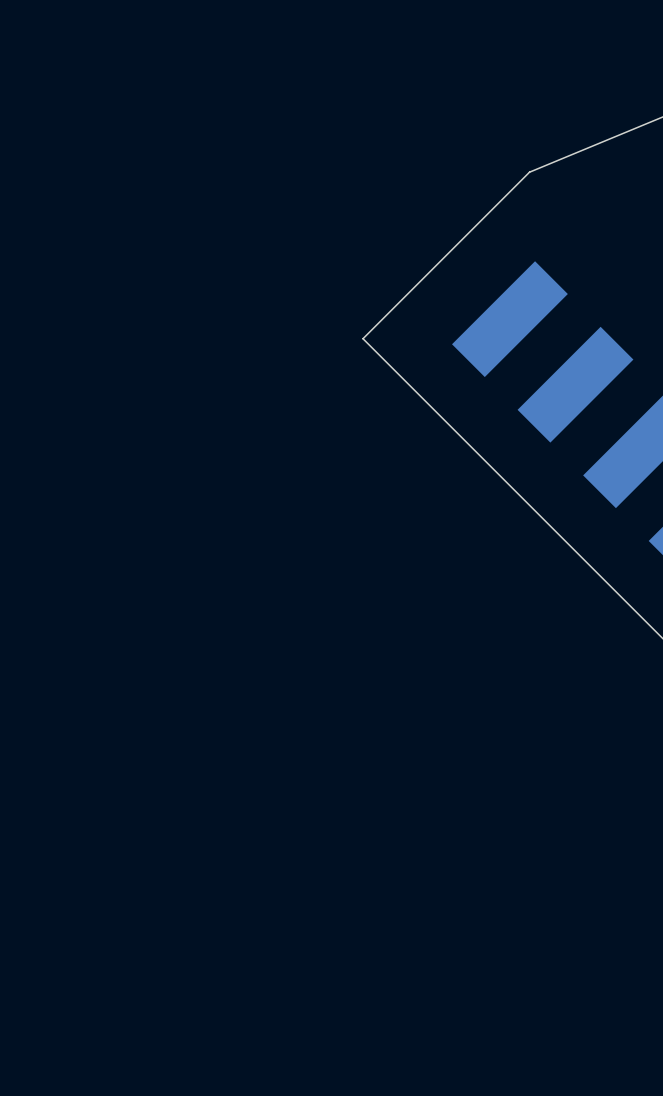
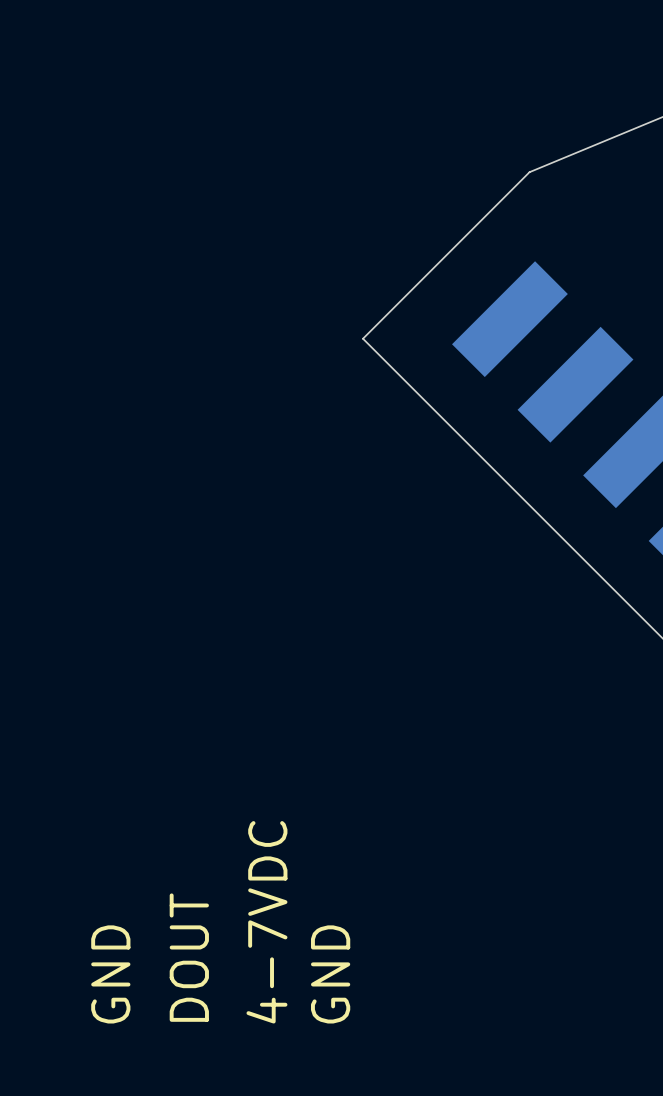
text: none -> 4-7VDC (266, 922)
text: none -> DOUT (189, 957)
text: none -> GND (110, 974)
text: none -> GND (330, 974)

